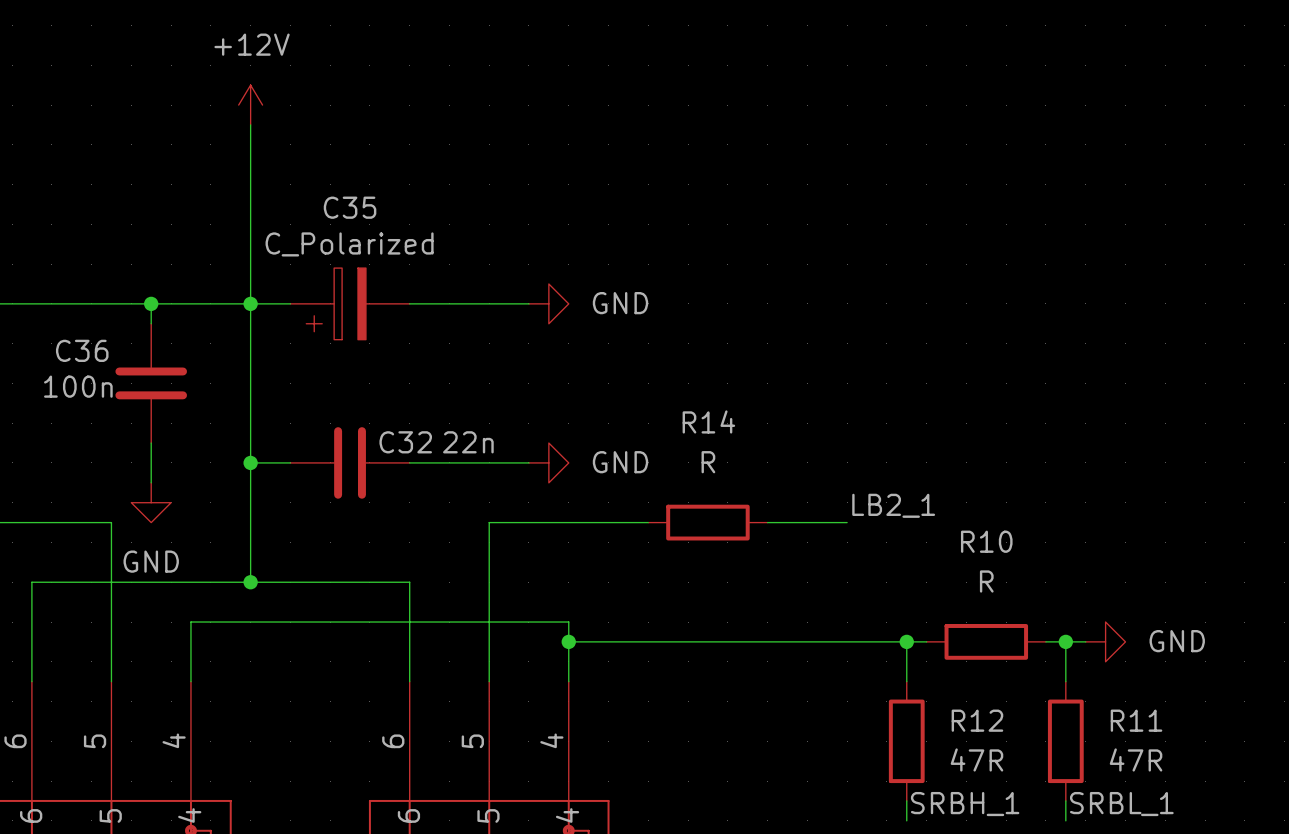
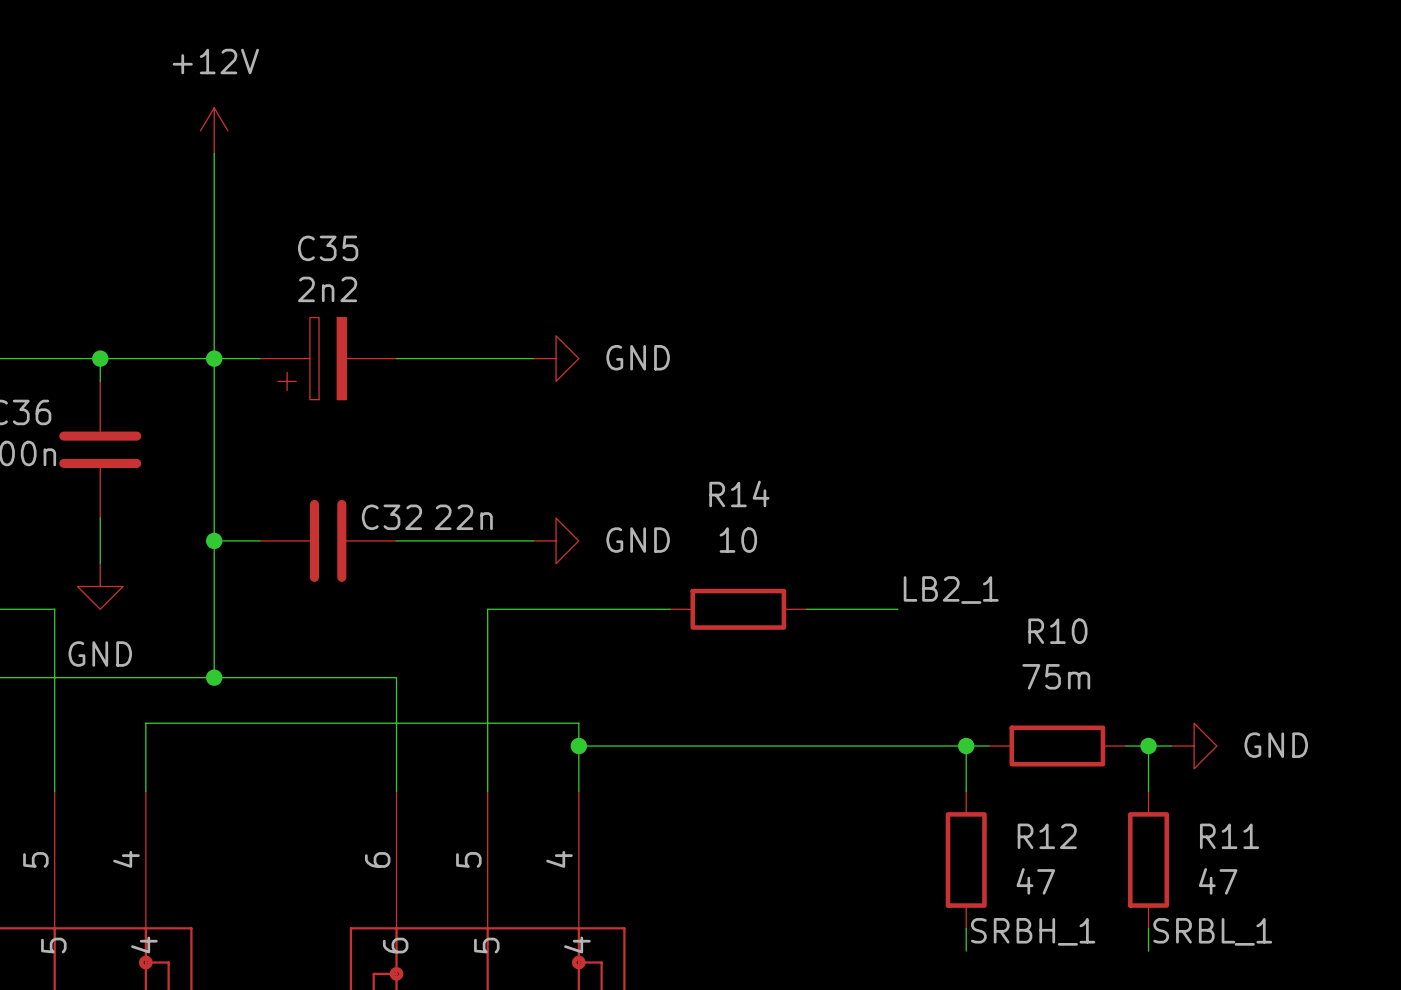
C35 value: C_Polarized (349, 244) -> 2n2 (327, 289)
R14 value: R (708, 462) -> 10 (738, 540)
R10 value: R (986, 581) -> 75m (1056, 676)
R12 value: 47R (976, 759) -> 47 (1035, 881)
R11 value: 47R (1136, 759) -> 47 (1218, 881)

